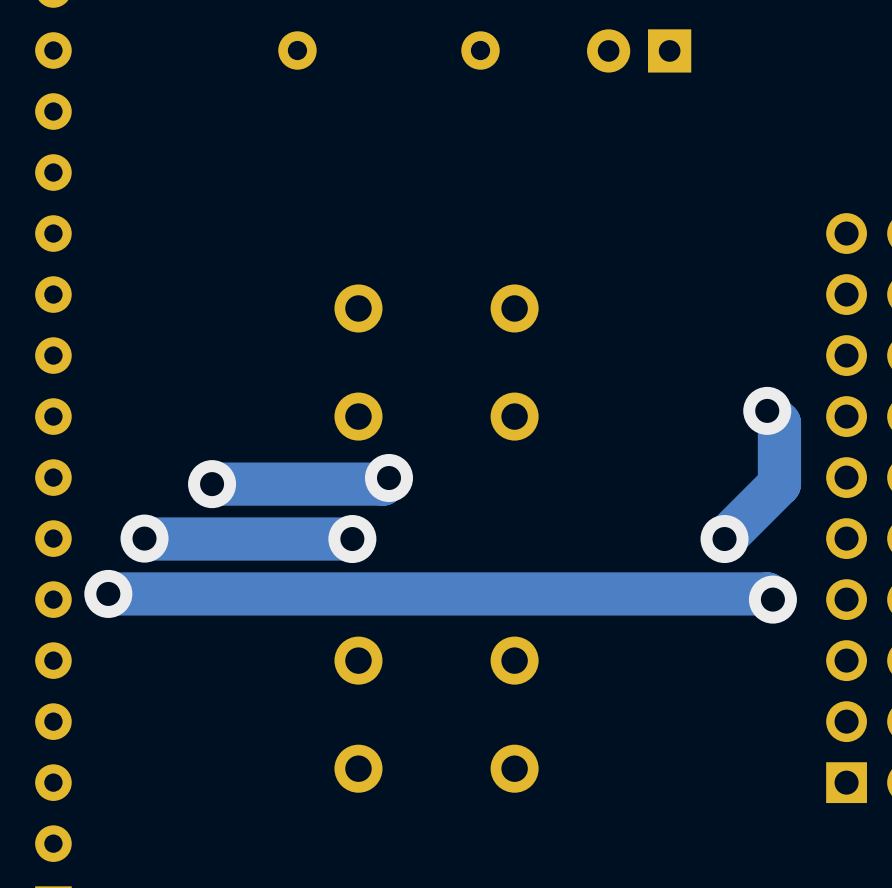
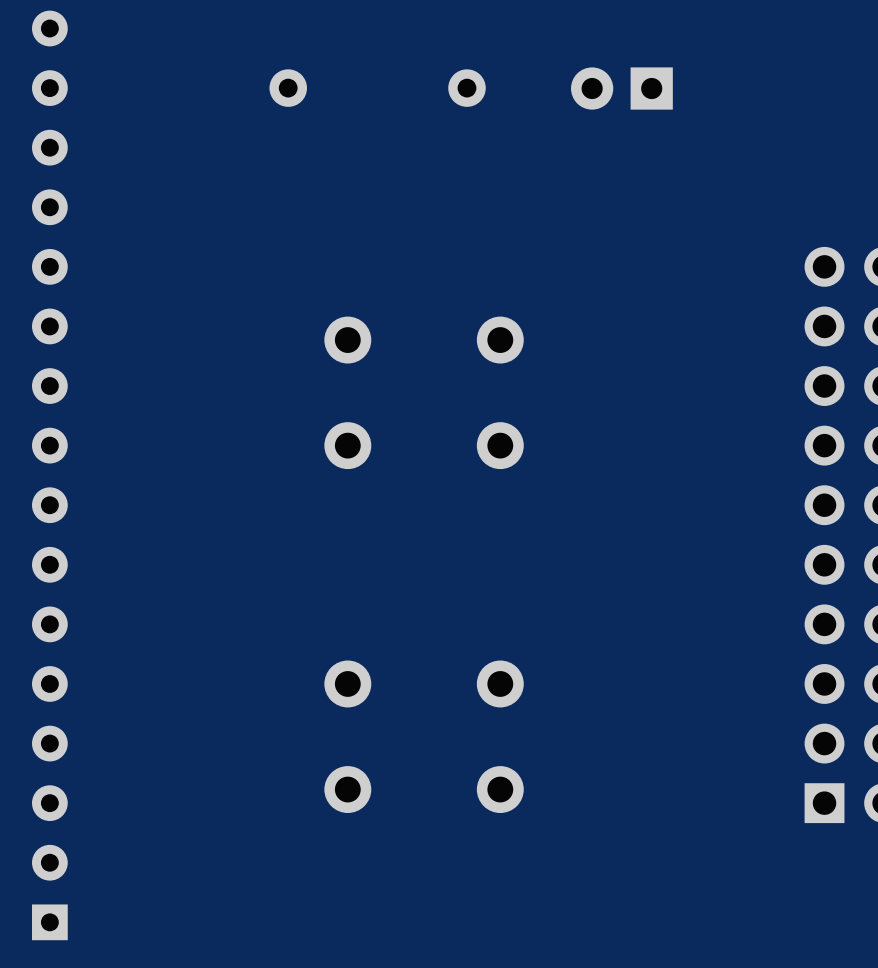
track: (767, 410) (779, 423) (779, 484) (724, 539) -> none
via: (767, 410) -> none
track: (388, 478) (382, 484) (212, 484) -> none
via: (388, 478) -> none
via: (212, 484) -> none
track: (144, 538) (352, 539) -> none
via: (144, 538) -> none
via: (352, 539) -> none
via: (724, 539) -> none
track: (108, 593) (767, 593) (772, 599) -> none
via: (108, 593) -> none
via: (772, 599) -> none

